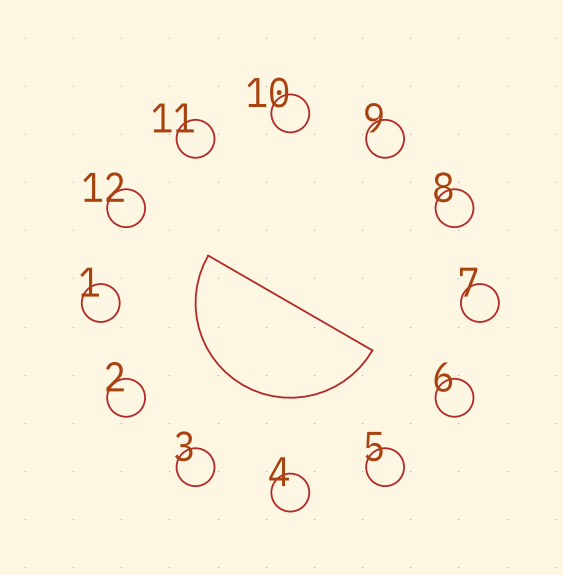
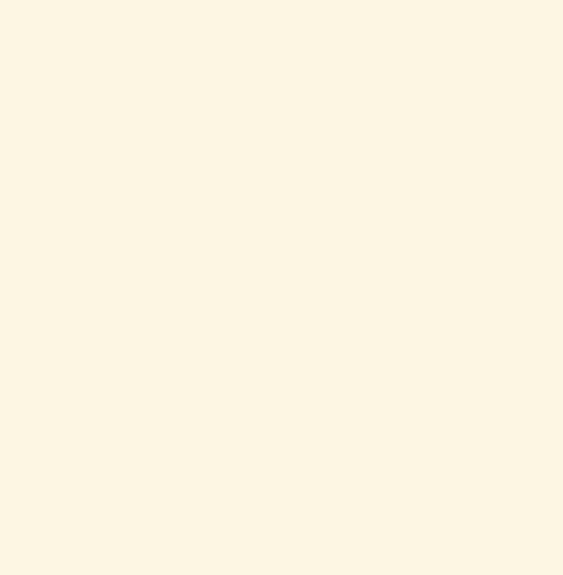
part: (290, 302) -> none

